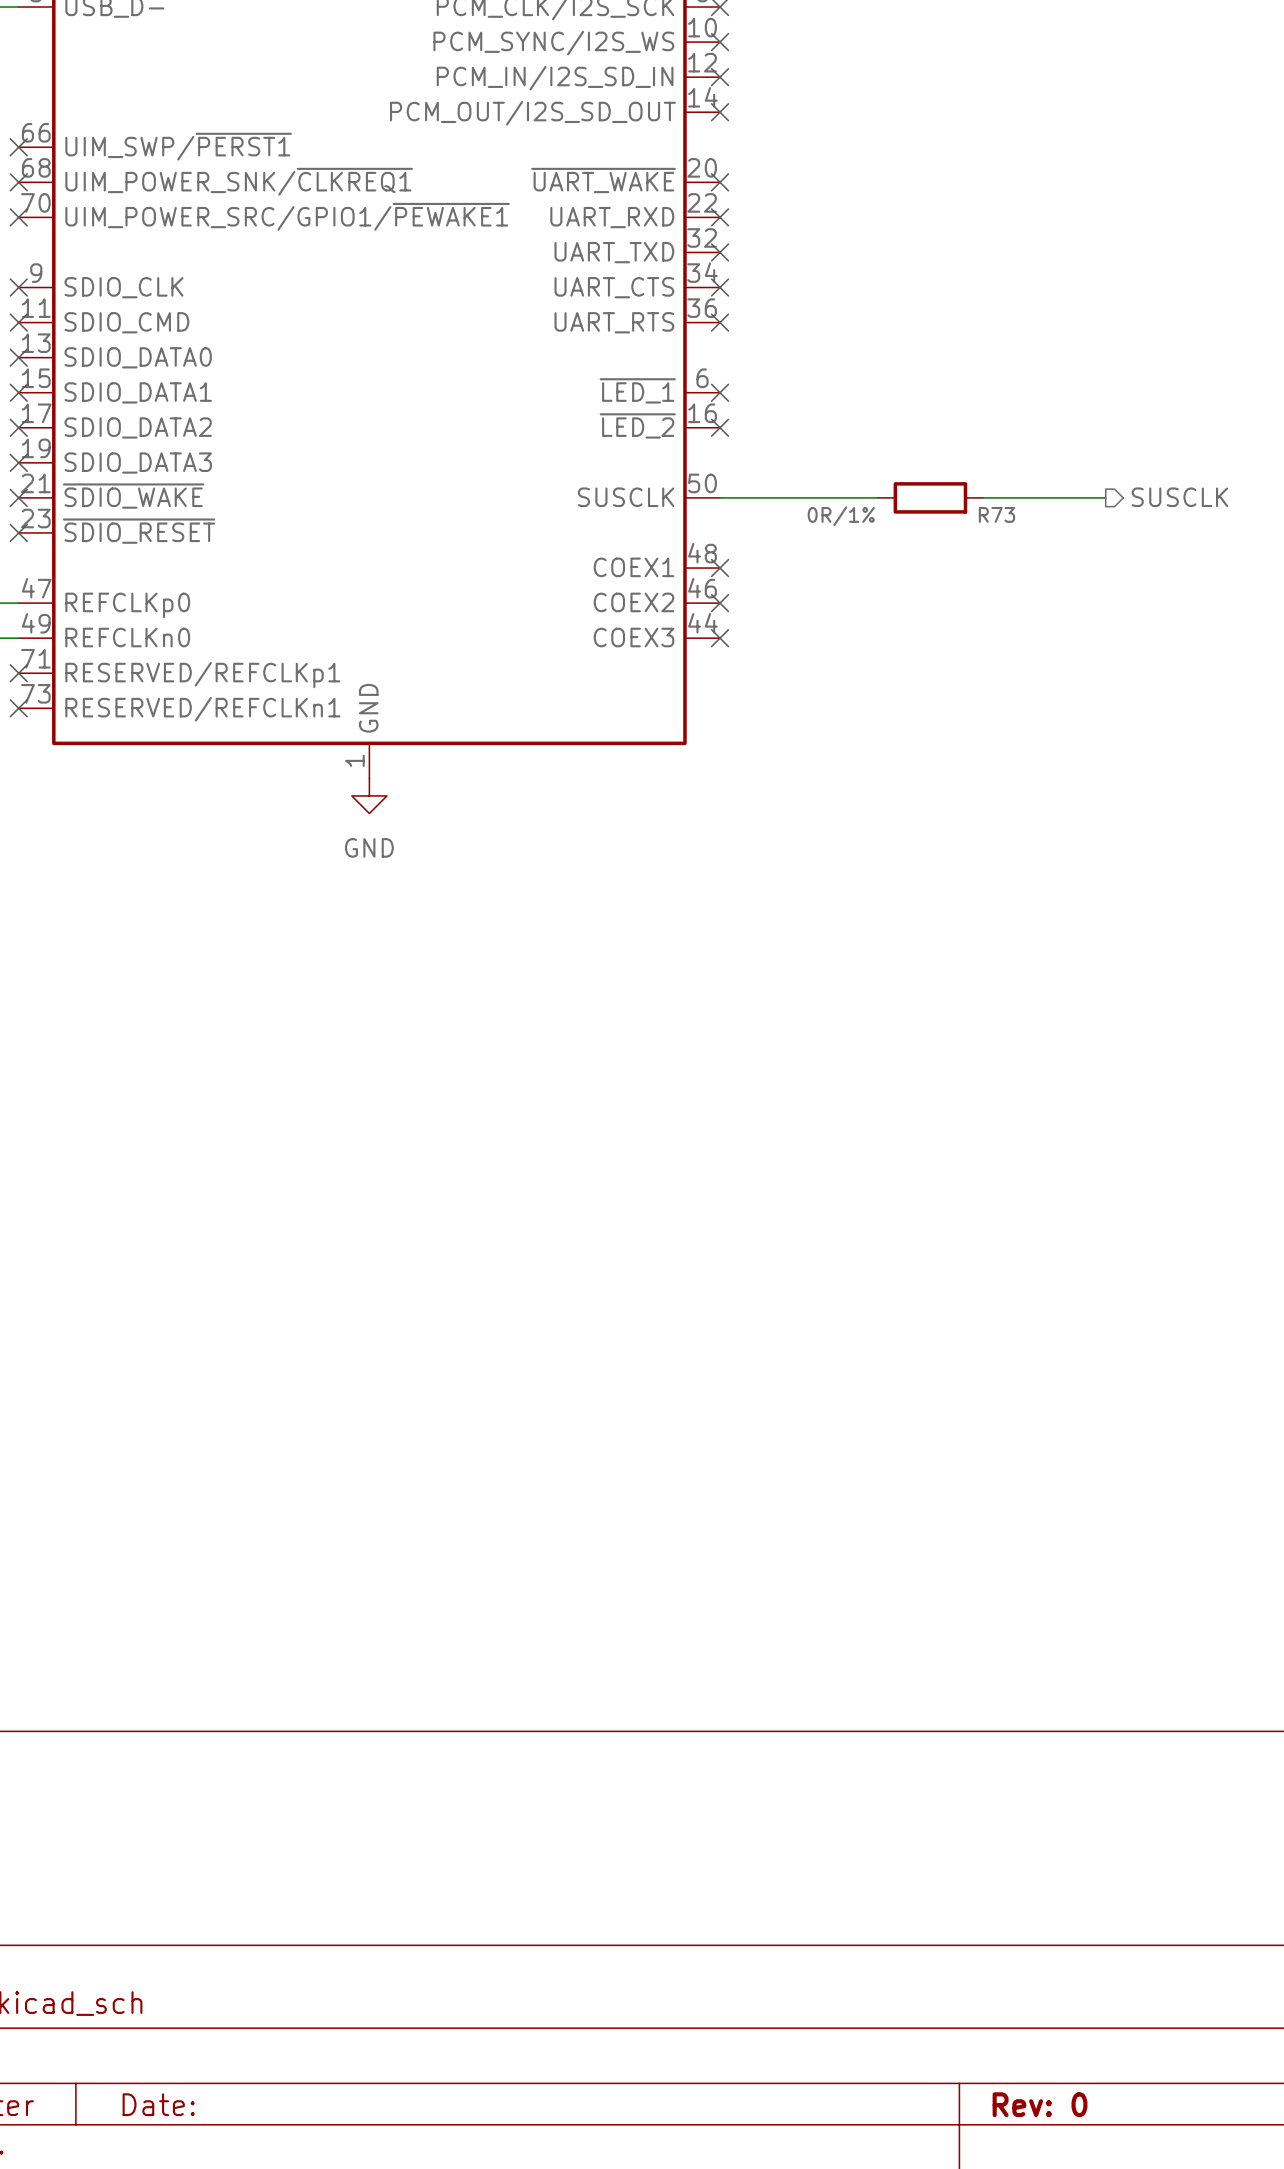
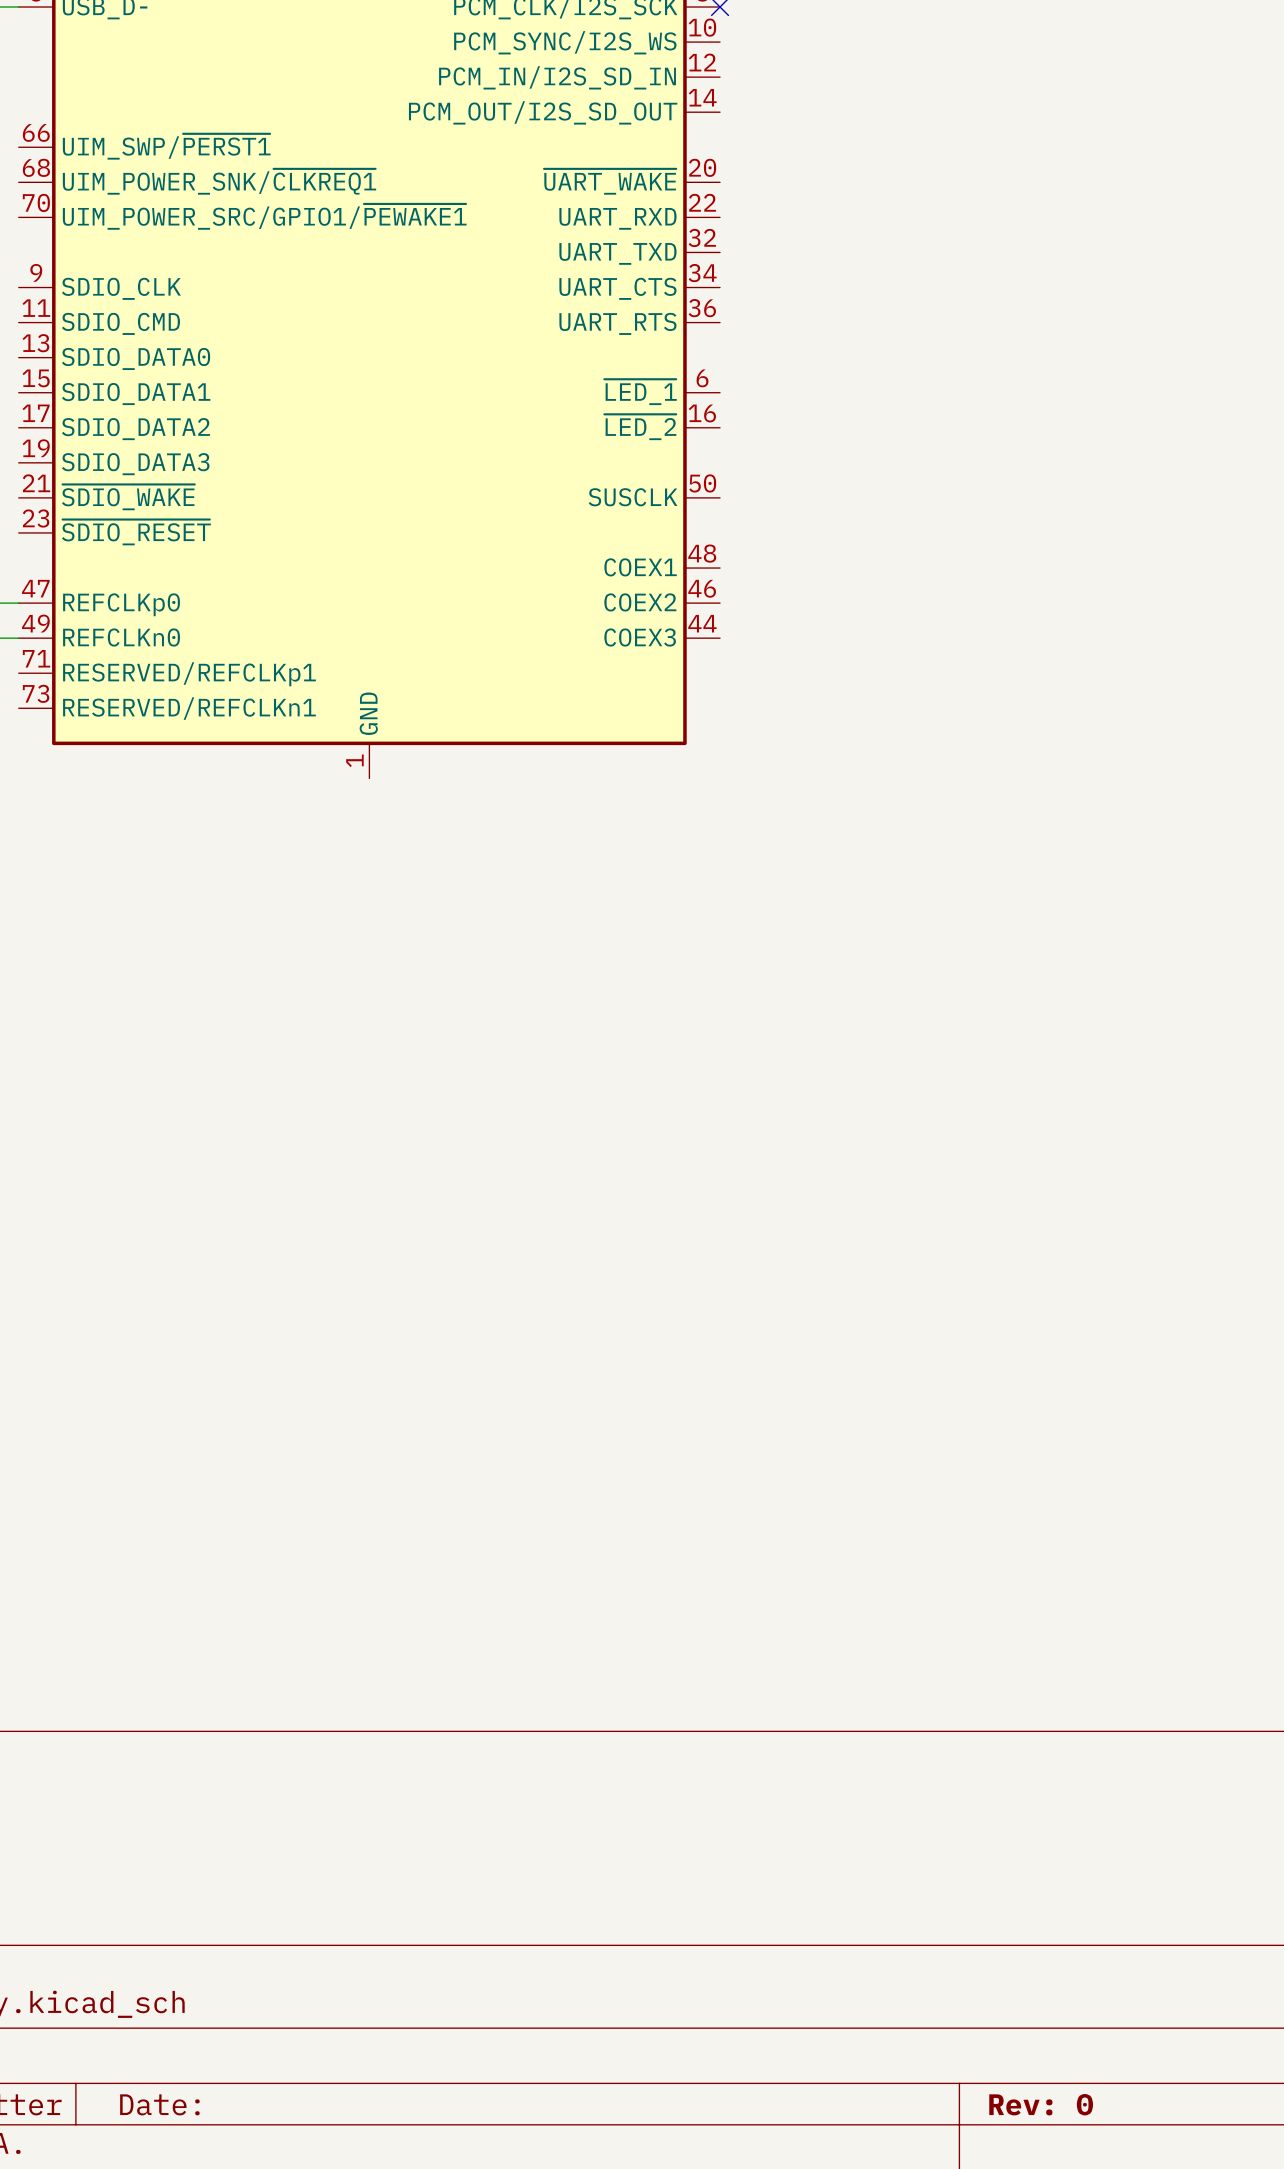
no-connect mark: (720, 42) -> none
no-connect mark: (720, 77) -> none
no-connect mark: (720, 112) -> none
no-connect mark: (18, 147) -> none
no-connect mark: (18, 182) -> none
no-connect mark: (720, 182) -> none
no-connect mark: (18, 217) -> none
no-connect mark: (720, 217) -> none
no-connect mark: (720, 252) -> none
no-connect mark: (18, 287) -> none
no-connect mark: (720, 287) -> none
no-connect mark: (18, 322) -> none
no-connect mark: (720, 322) -> none
no-connect mark: (18, 357) -> none
no-connect mark: (18, 392) -> none
no-connect mark: (720, 392) -> none
no-connect mark: (18, 427) -> none
no-connect mark: (720, 427) -> none
no-connect mark: (18, 462) -> none
no-connect mark: (18, 497) -> none
wire: (720, 497) (877, 497) -> none
R73: 0R/1% (930, 497) -> none
wire: (983, 497) (1105, 497) -> none
hierarchical label: SUSCLK (1179, 497) -> none
no-connect mark: (18, 532) -> none
no-connect mark: (720, 568) -> none
no-connect mark: (720, 603) -> none
no-connect mark: (720, 638) -> none
no-connect mark: (18, 673) -> none
no-connect mark: (18, 708) -> none
power symbol: GND (369, 795) -> none

